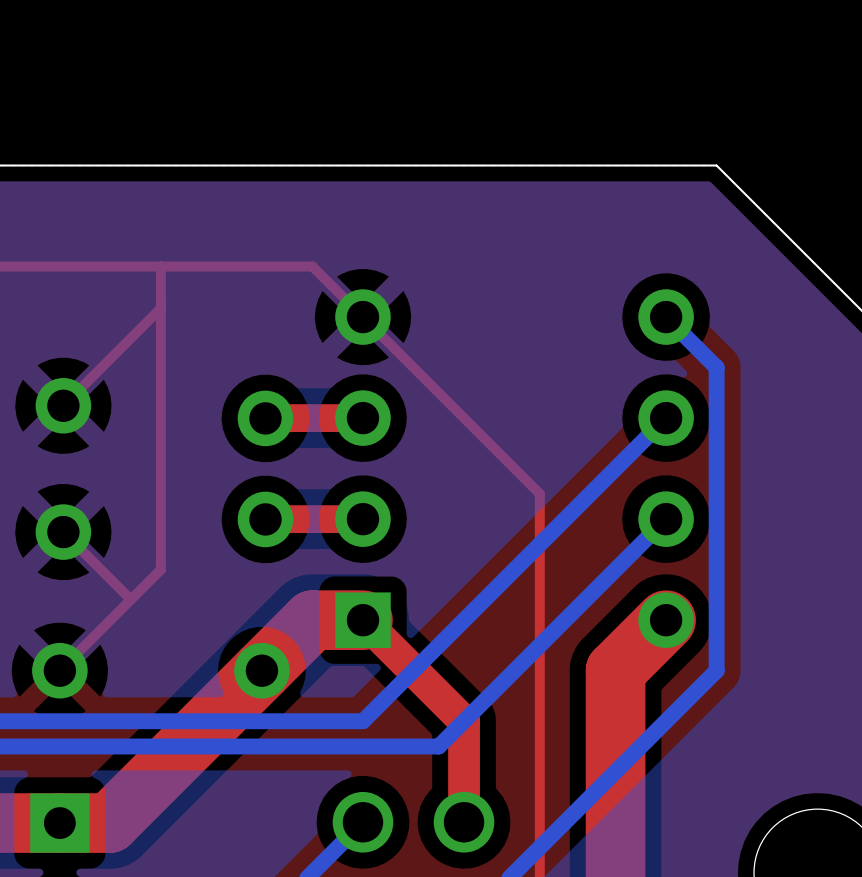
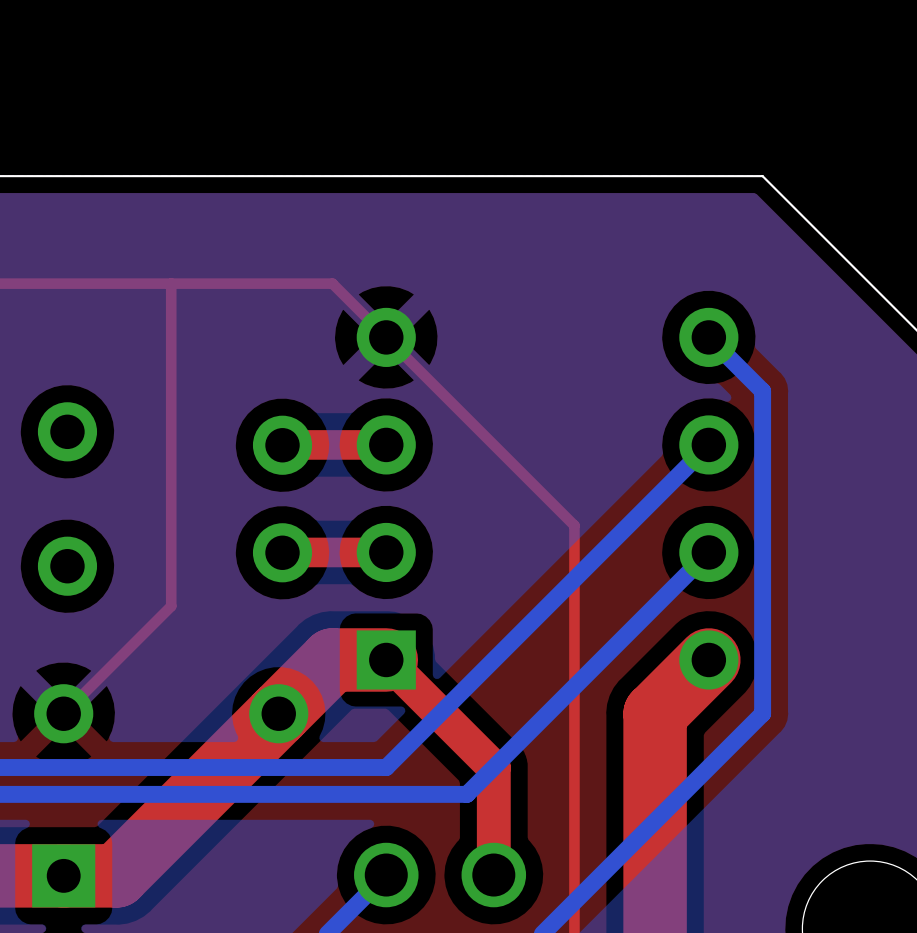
top track: (160, 308) (63, 405) -> none
top track: (63, 532) (129, 598) (129, 601) -> none

